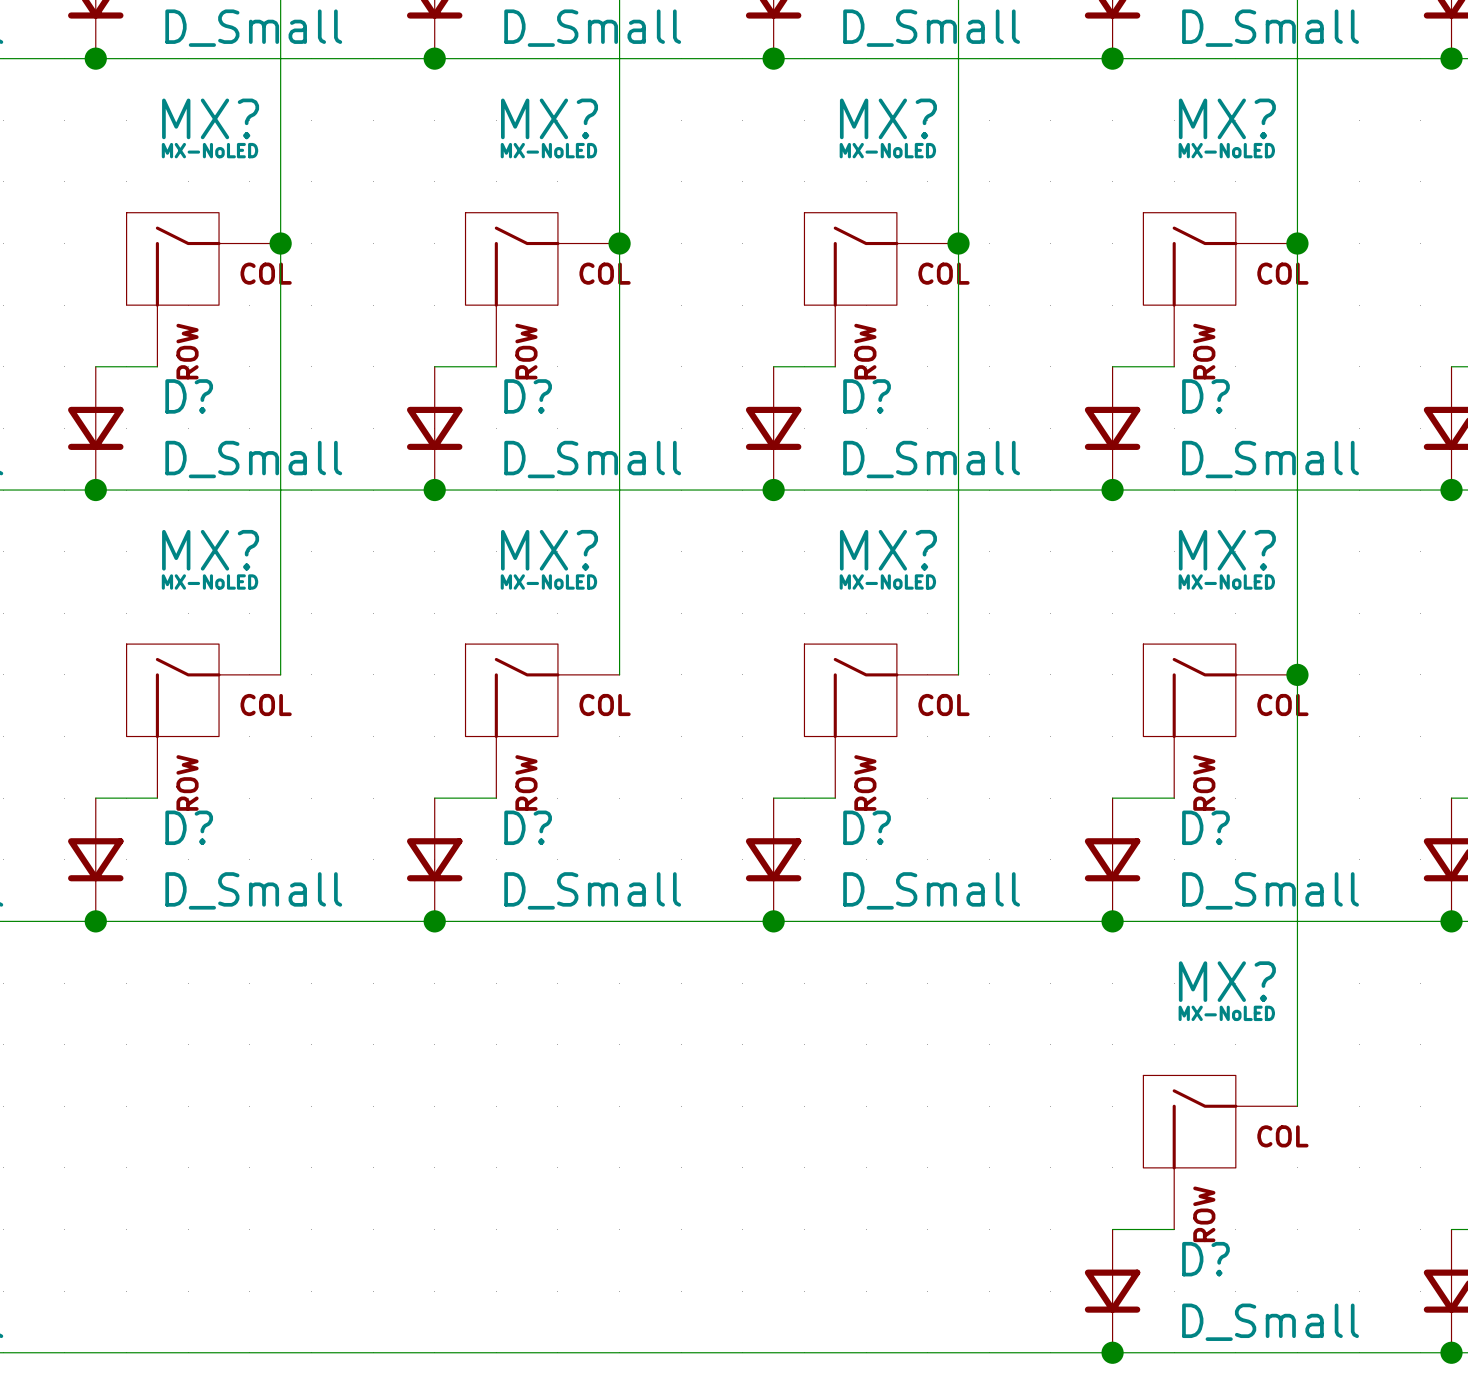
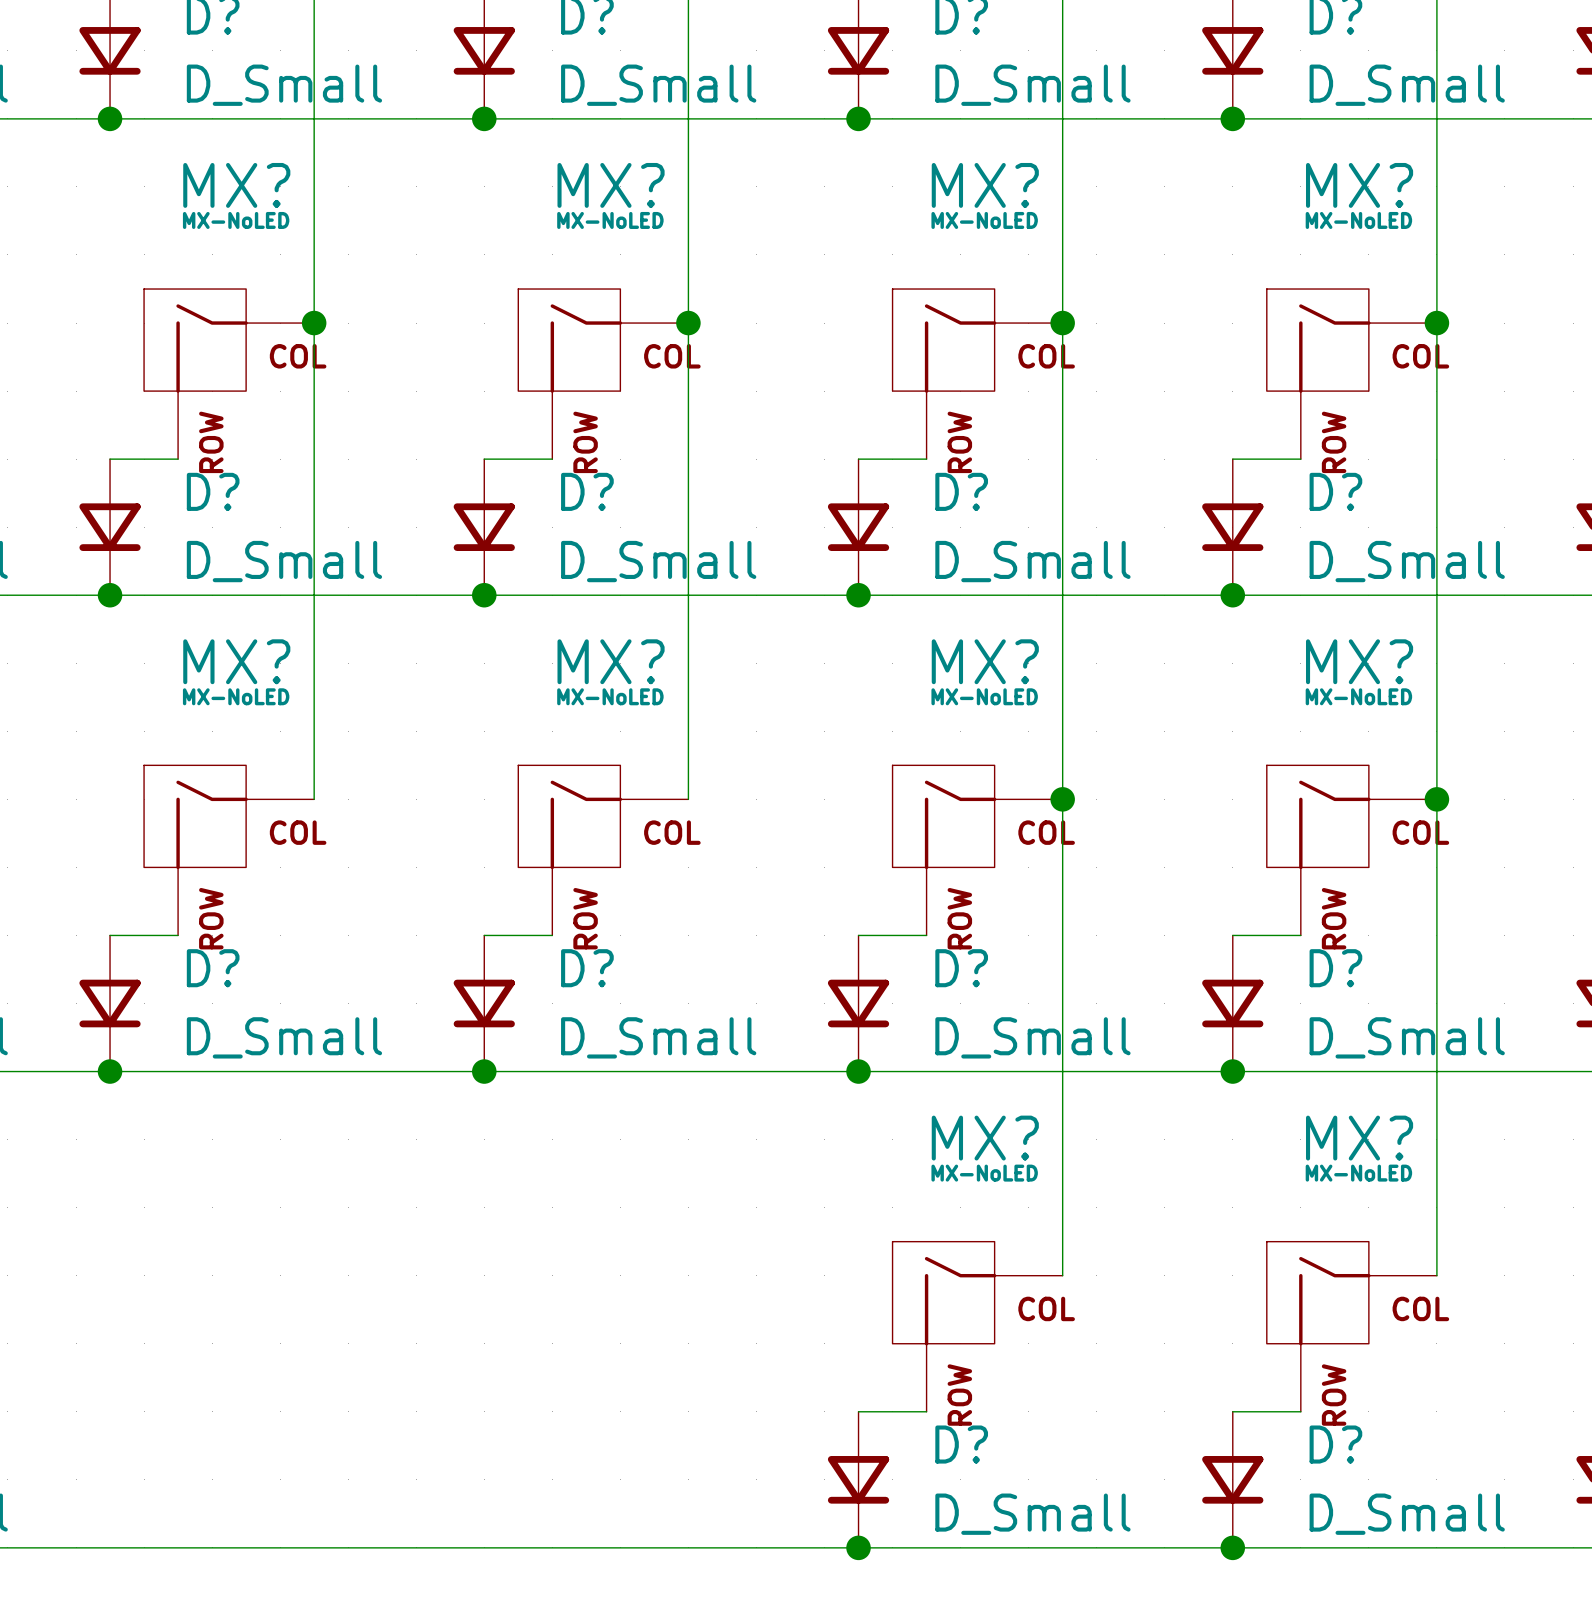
wire: none -> (1062, 799) (1062, 1275)
junction: none -> (1062, 799)
MX?: none -> MX-NoLED (977, 1326)
wire: none -> (858, 1411) (926, 1411)
D?: none -> D_Small (858, 1479)
junction: none -> (858, 1547)

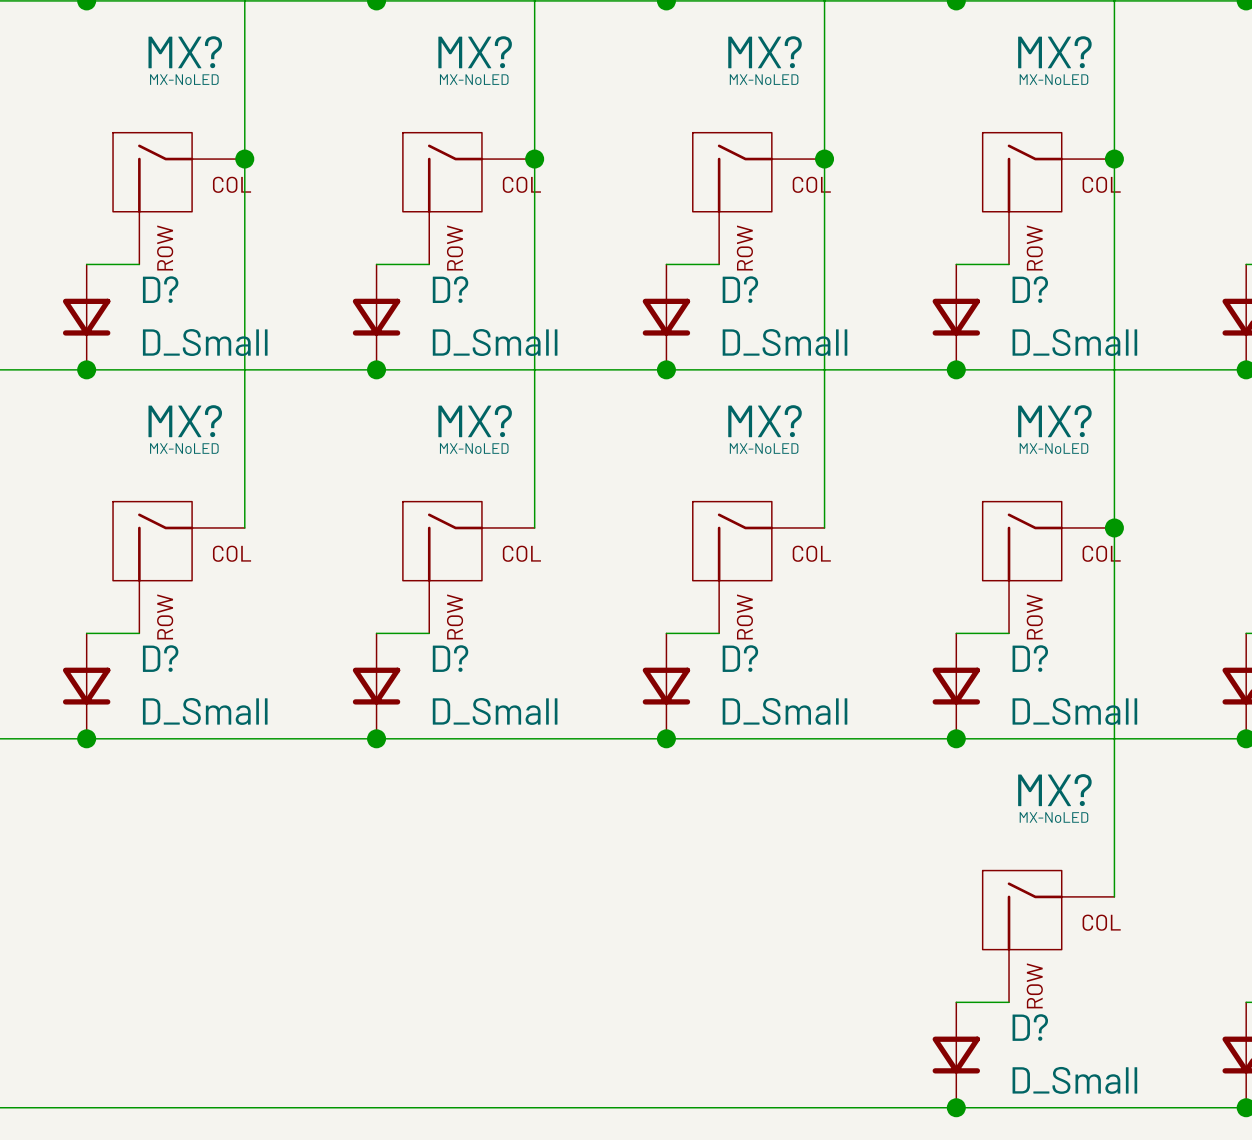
wire: (1062, 799) (1062, 1275) -> none
junction: (1062, 799) -> none
MX?: MX-NoLED (977, 1326) -> none
wire: (858, 1411) (926, 1411) -> none
D?: D_Small (858, 1479) -> none
junction: (858, 1547) -> none

